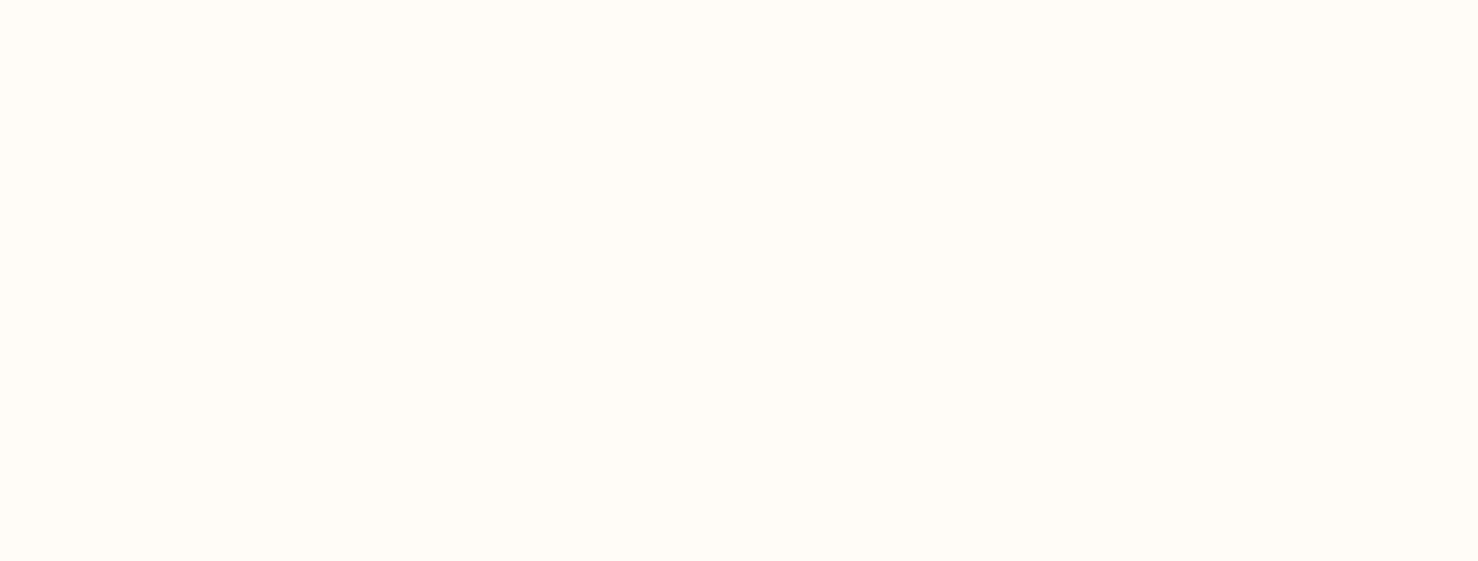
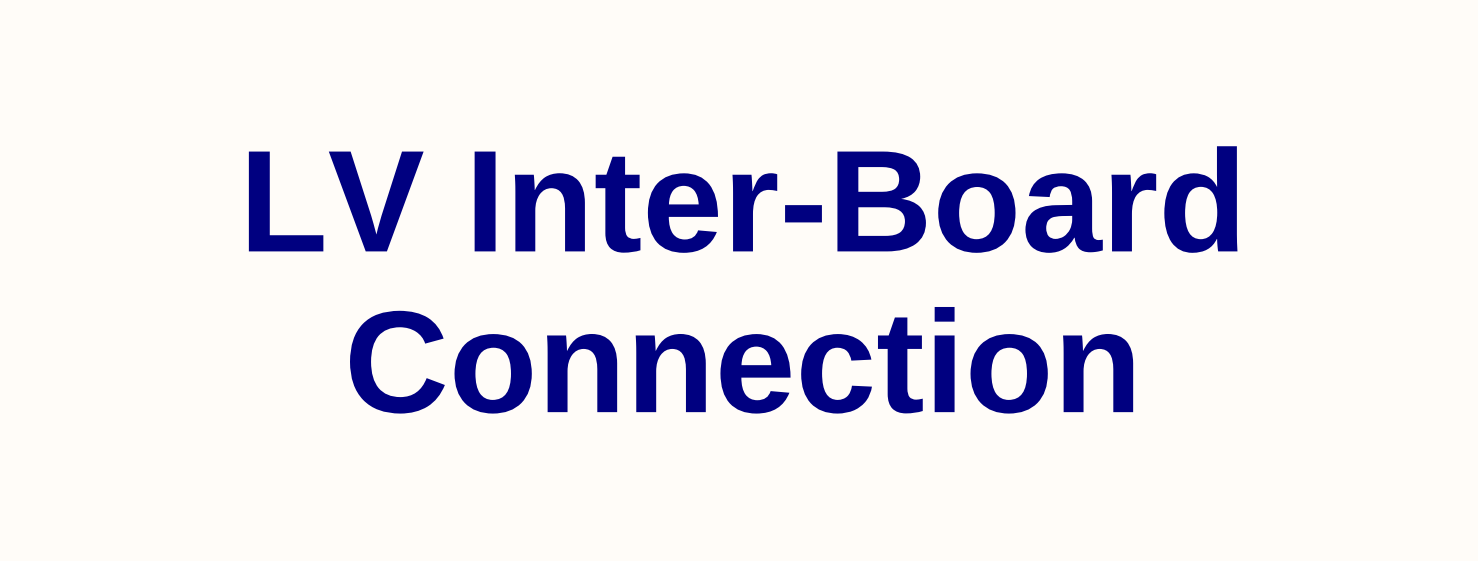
text: none -> LV Inter-Board (743, 199)
text: none -> Connection (741, 360)

